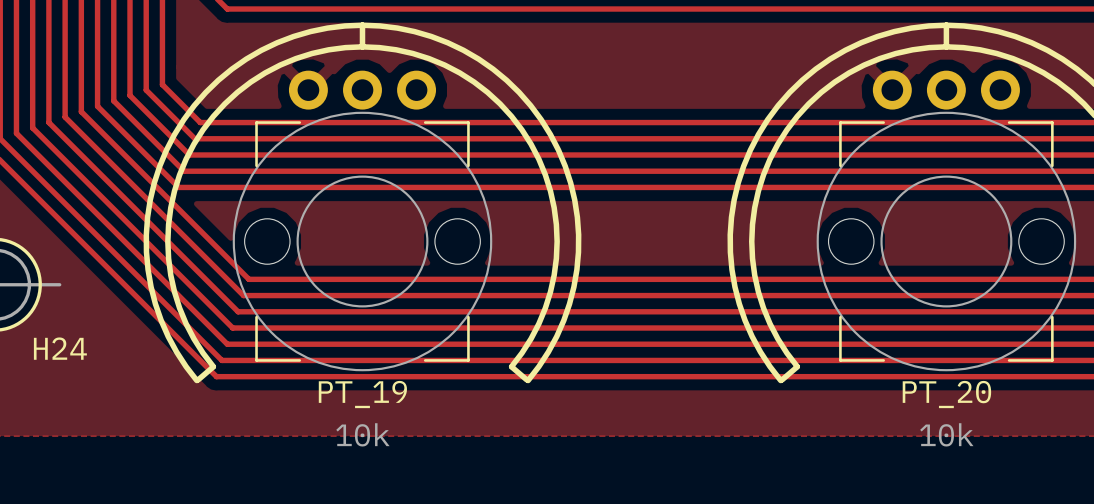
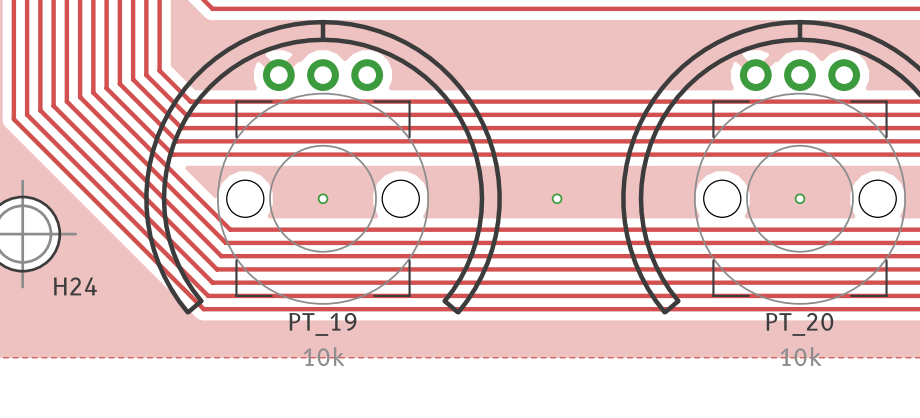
via: none -> (323, 198)
via: none -> (557, 198)
via: none -> (799, 198)

